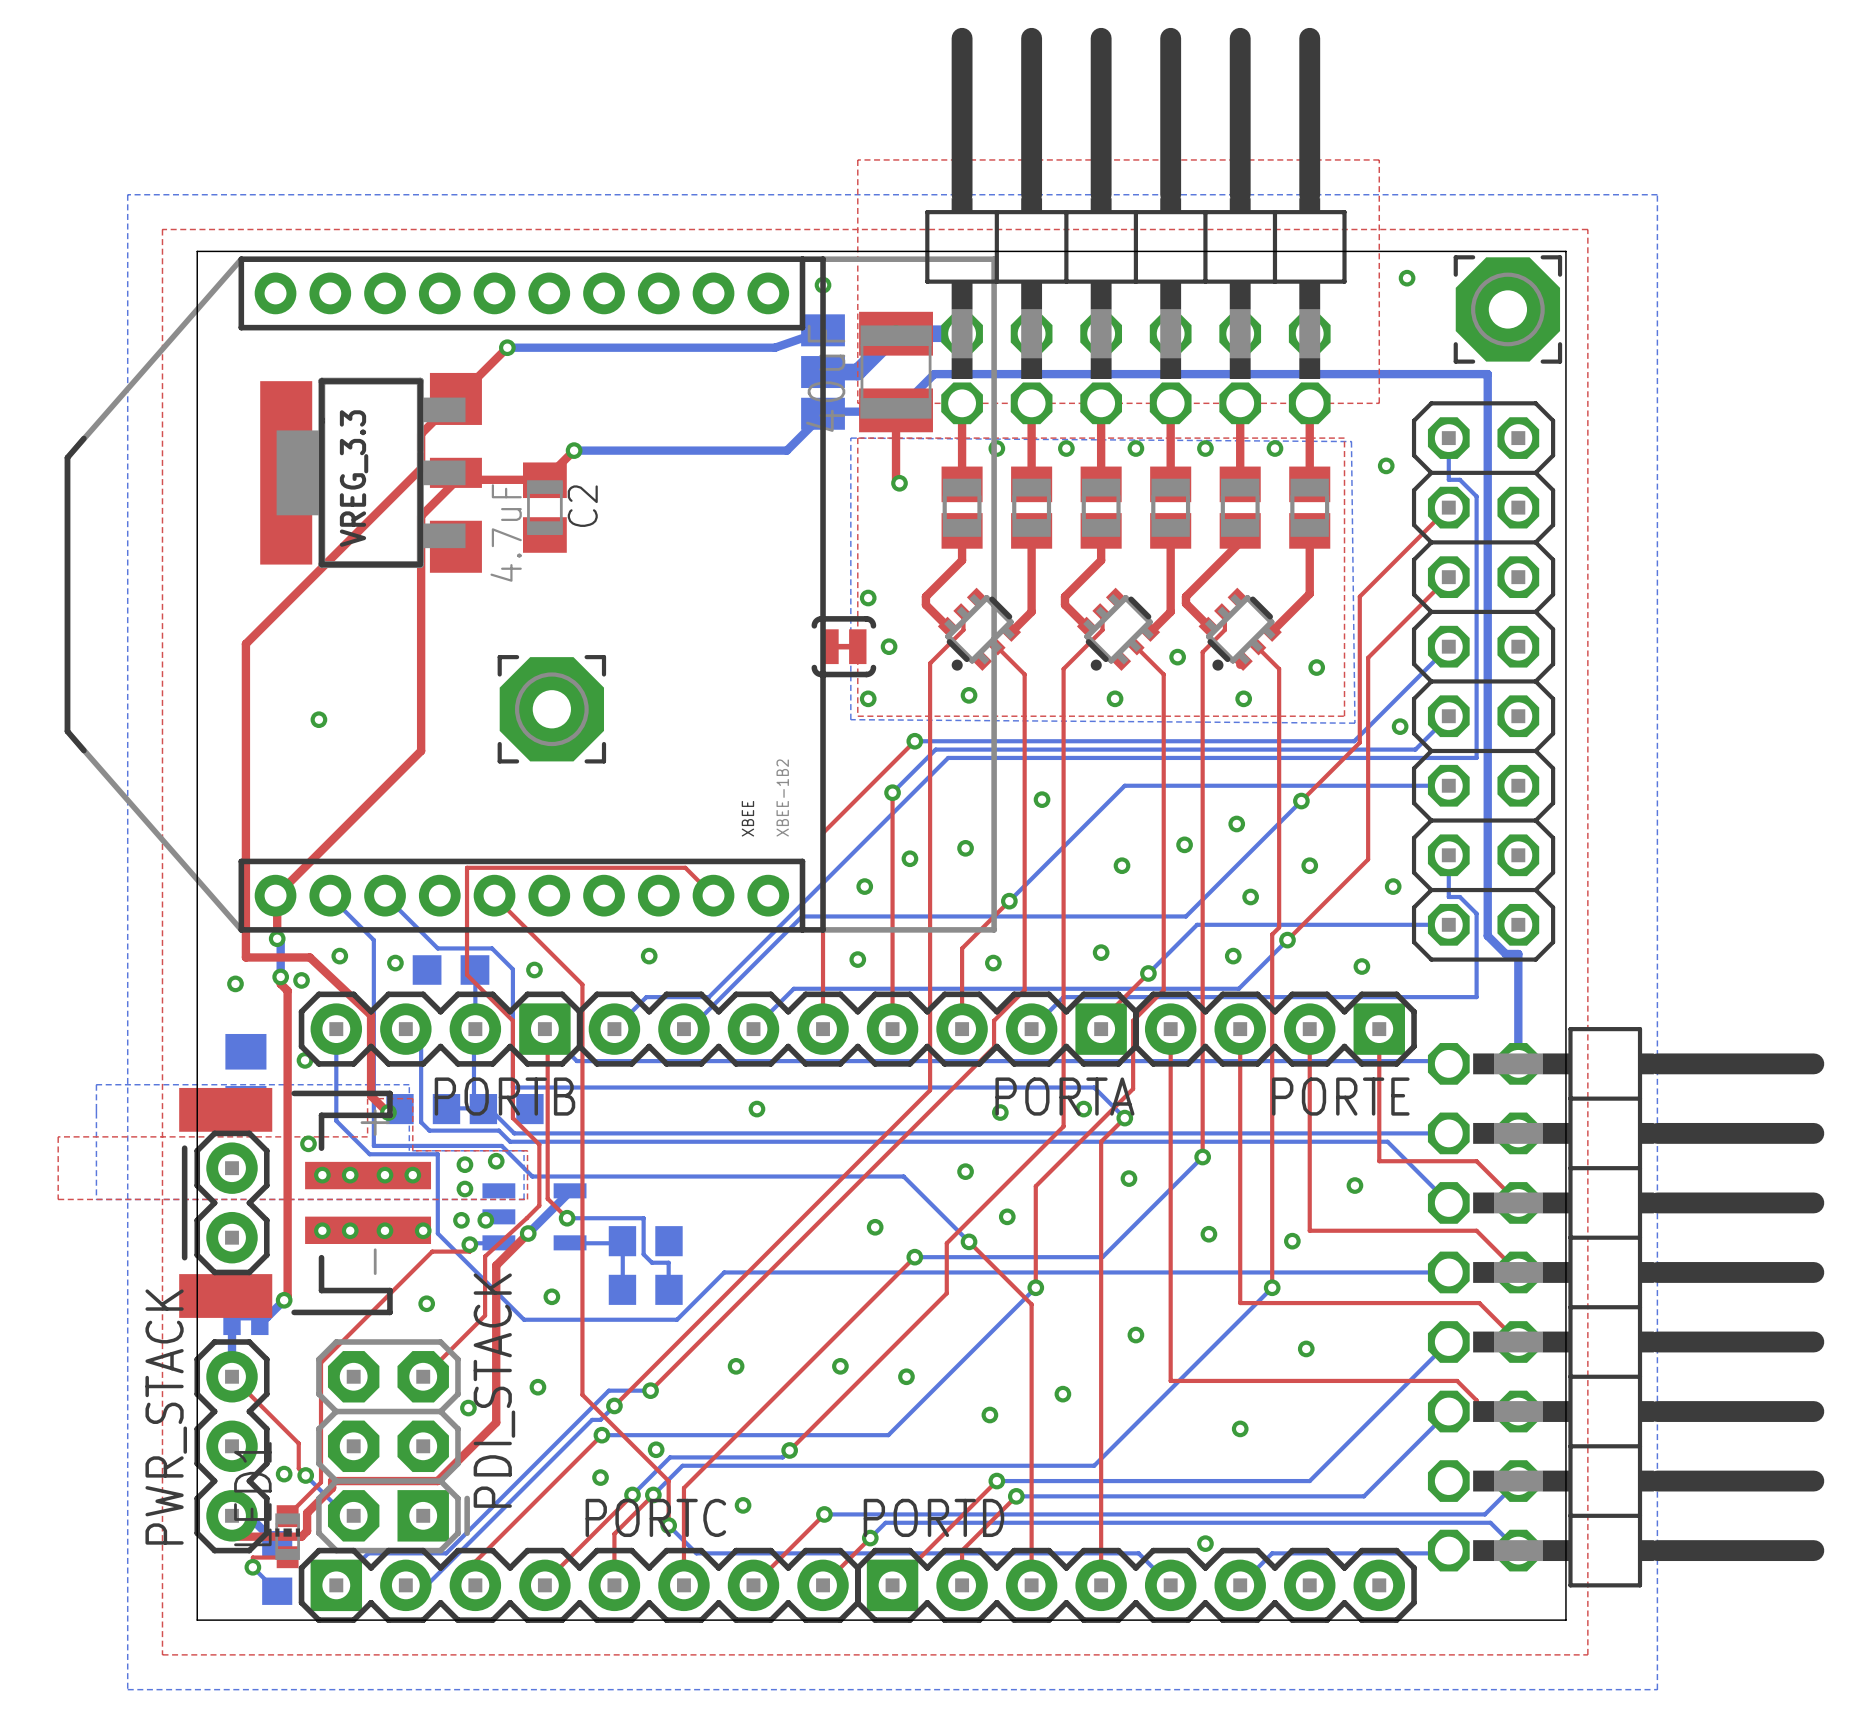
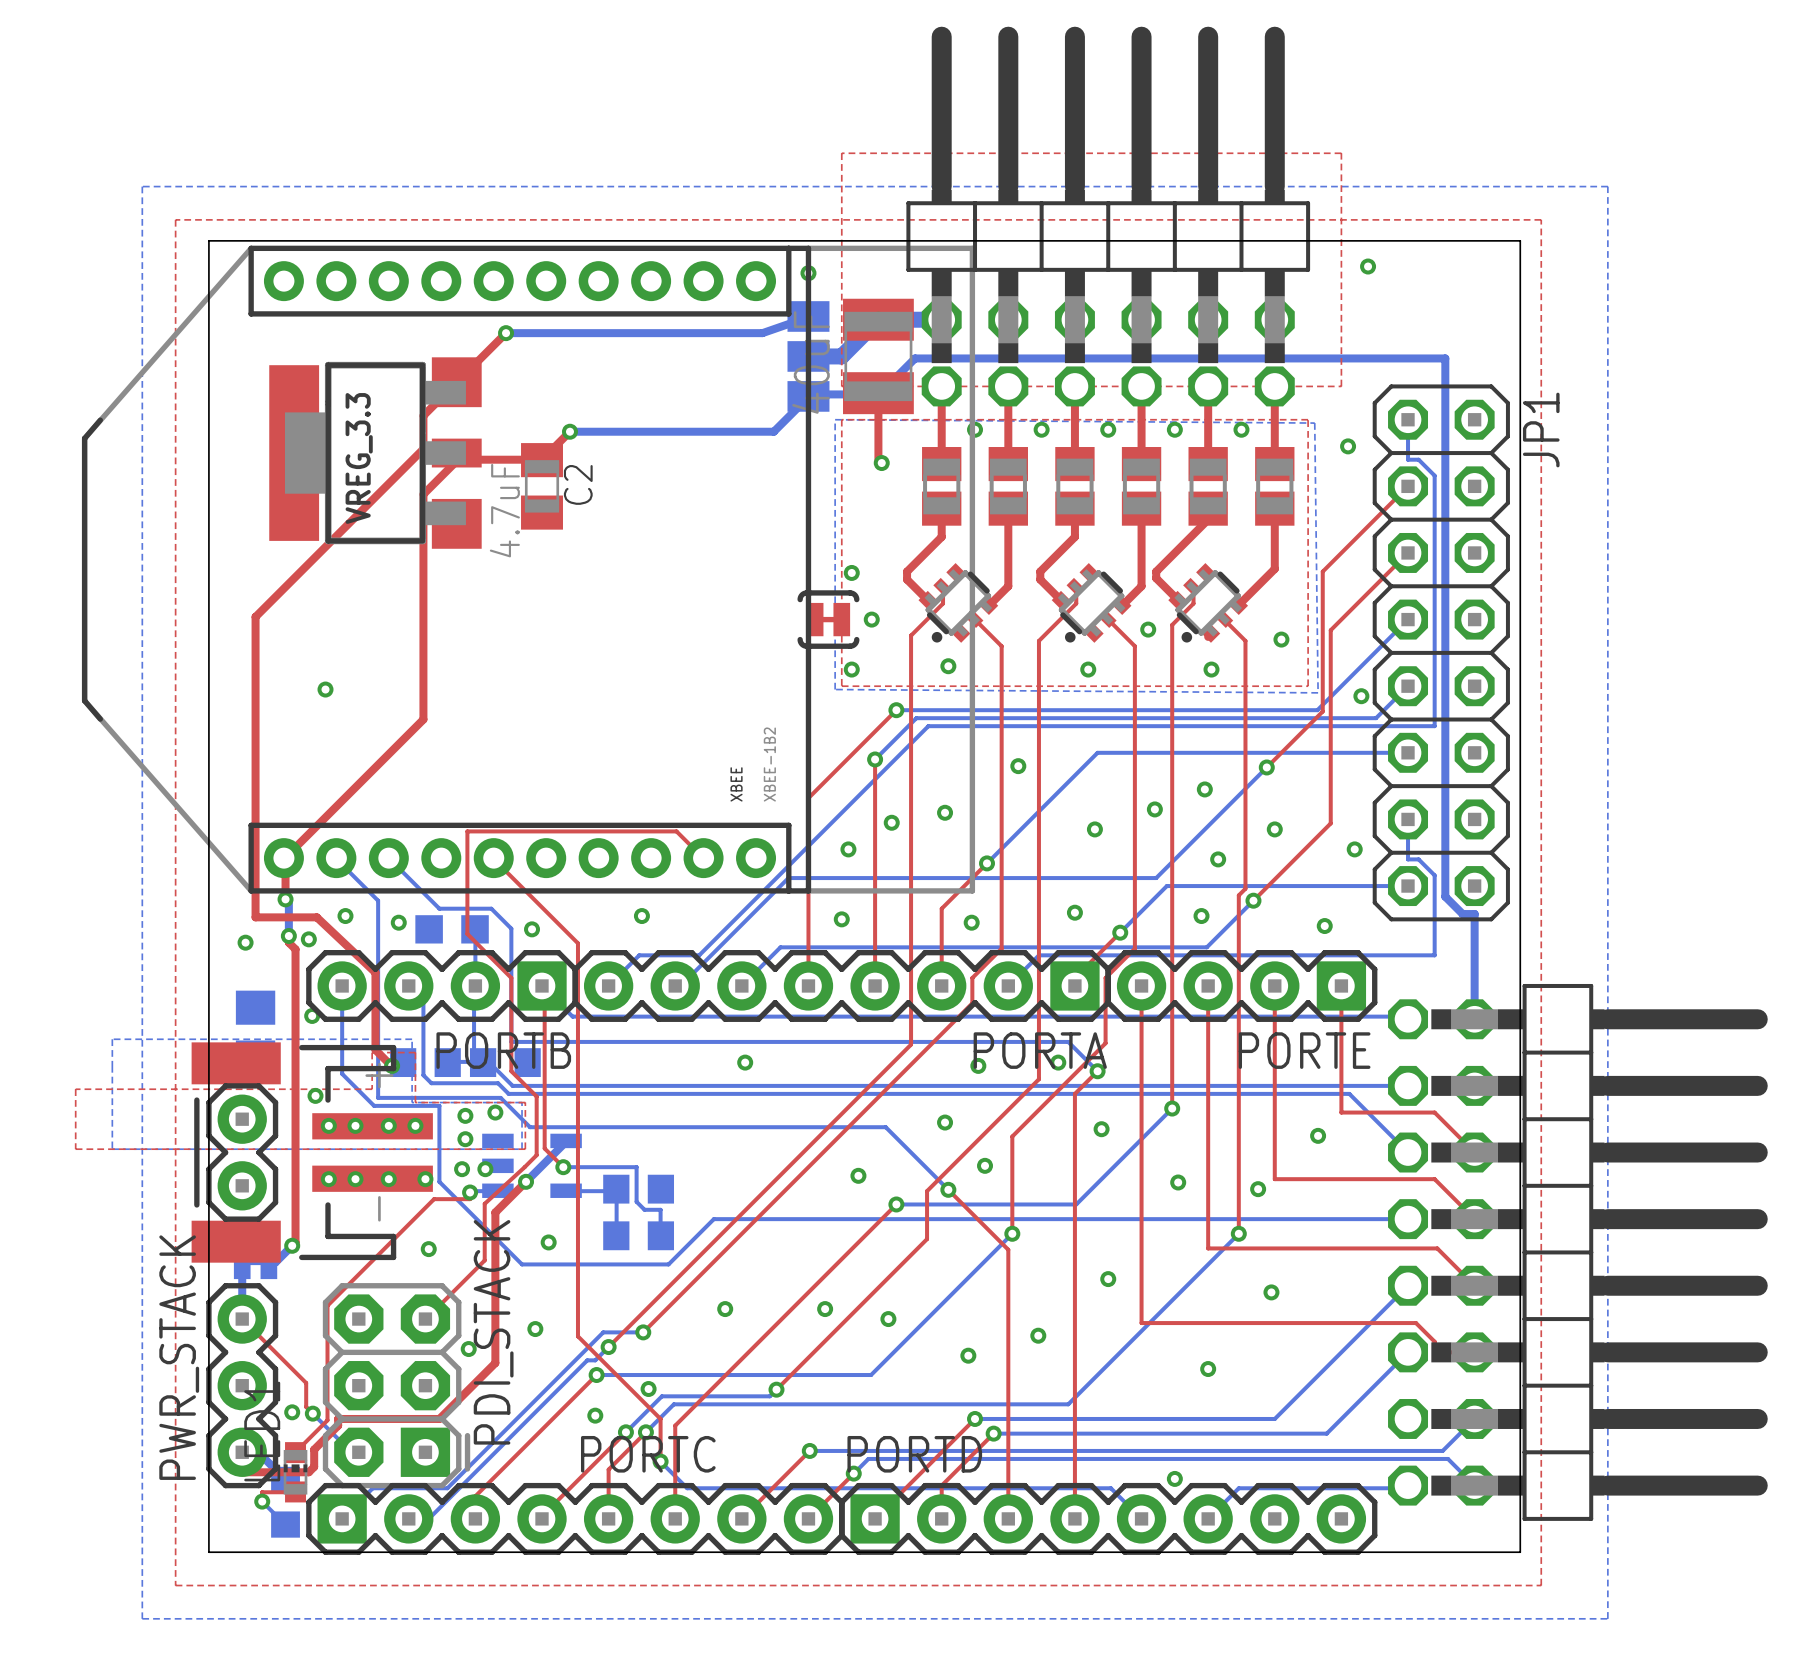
part: (1507, 309) -> none
JP1 name: none -> JP1 (1541, 430)
part: (551, 709) -> none
via: (743, 1505) -> none

